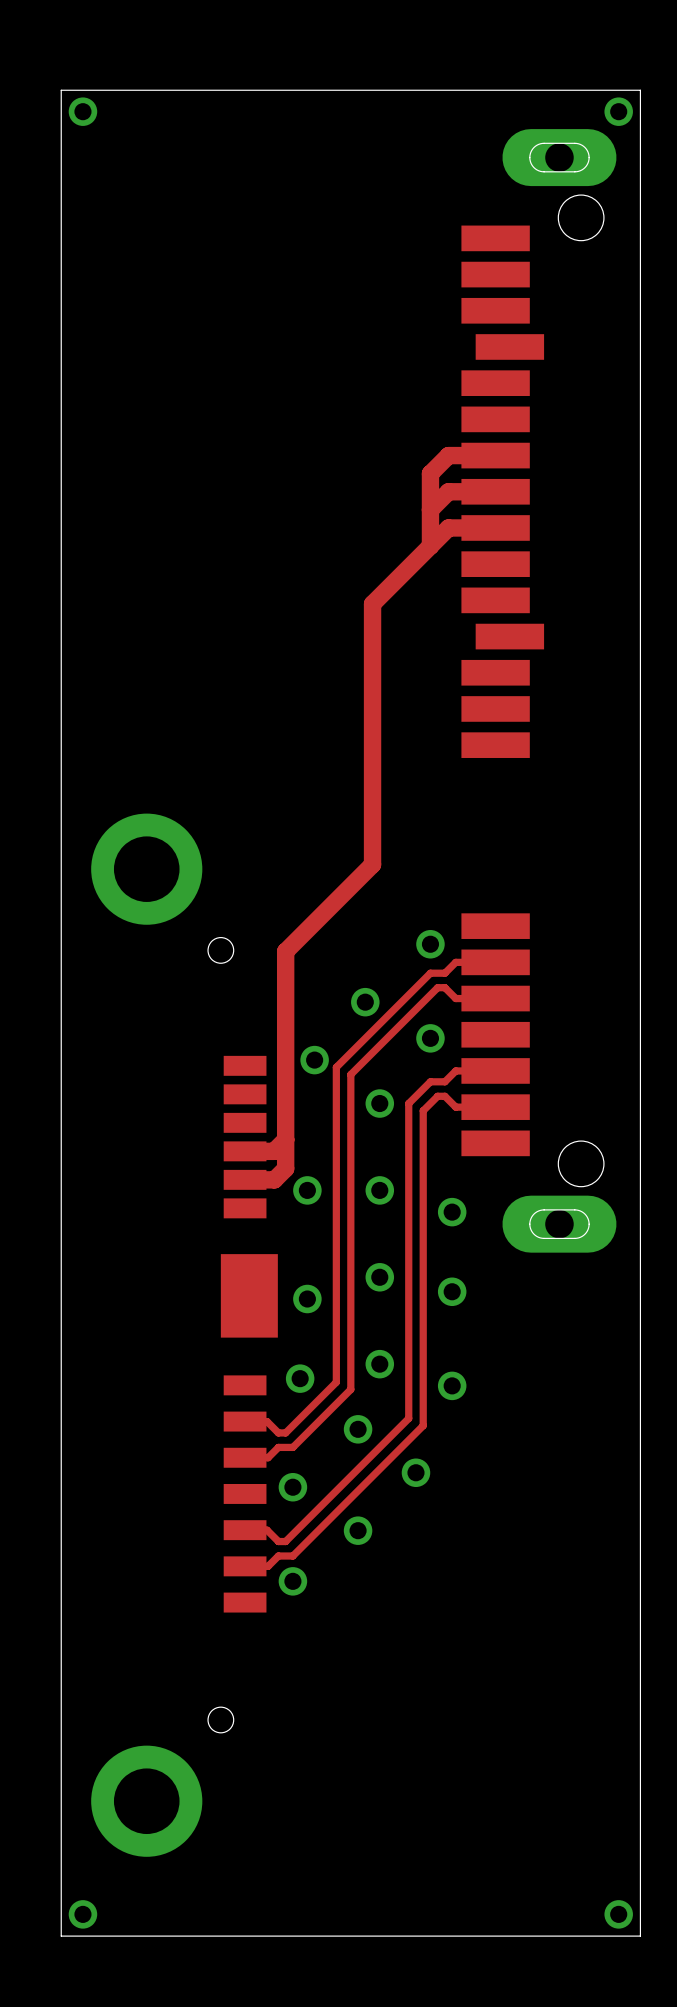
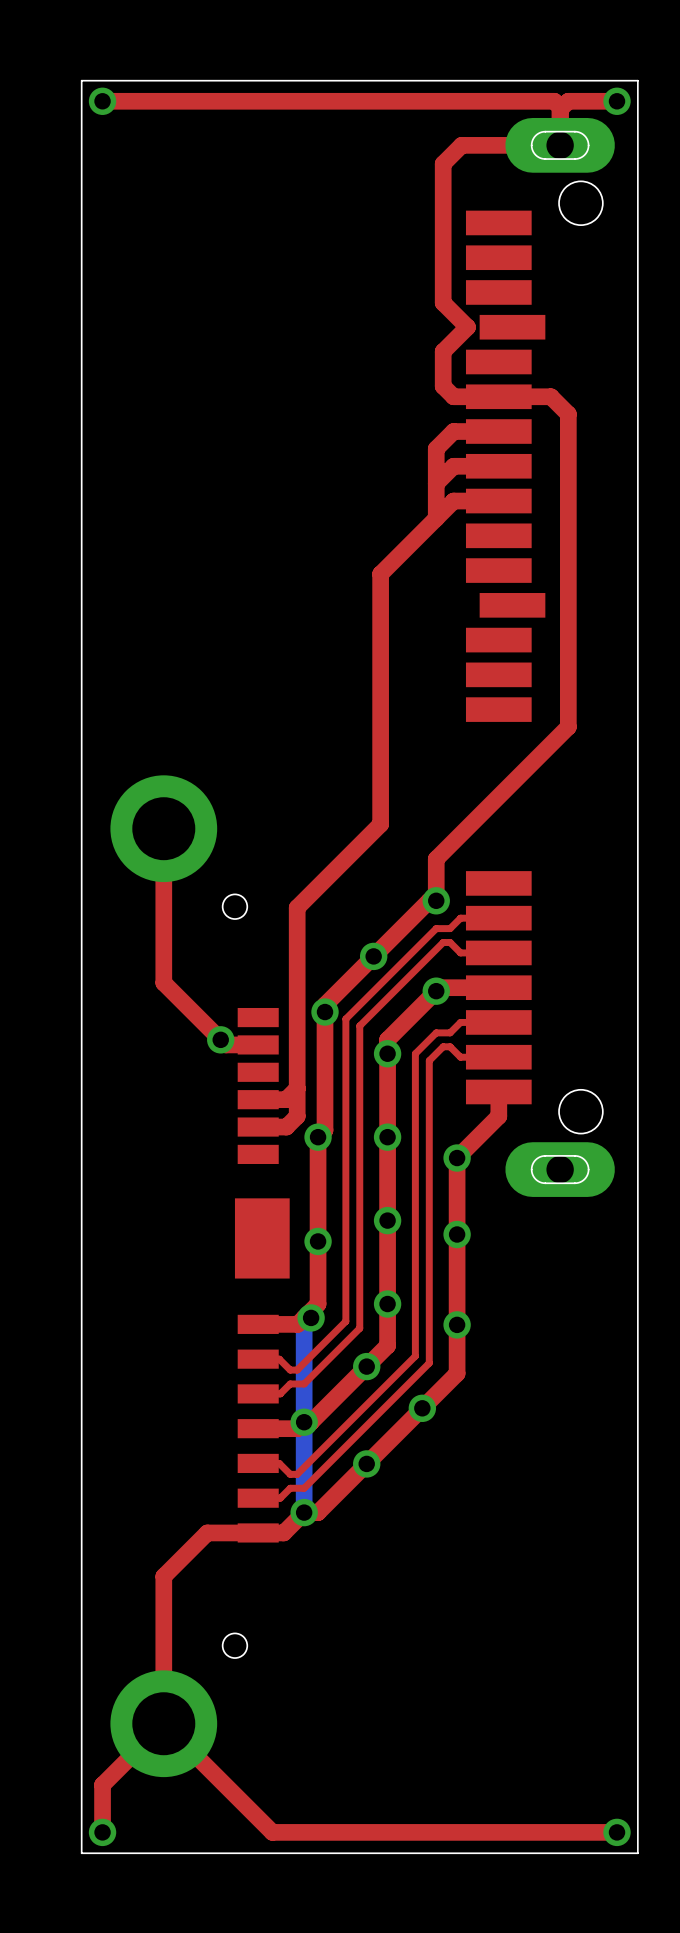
top track: none -> (102, 101) (554, 101) (560, 106) (560, 145) (461, 145) (443, 163) (443, 302) (467, 327) (443, 351) (443, 386) (453, 396) (550, 396) (568, 414) (568, 726) (436, 859) (436, 900) (429, 900) (325, 1005) (325, 1130) (318, 1137) (318, 1304) (297, 1324) (258, 1324)
top track: none -> (617, 101) (568, 101) (560, 109)
top track: none -> (163, 828) (163, 982) (225, 1044) (258, 1044)
top track: none -> (498, 987) (439, 987) (387, 1039) (387, 1345) (311, 1422) (304, 1422) (297, 1428) (258, 1428)
via: none -> (220, 1039)
top track: none -> (498, 1091) (498, 1116) (457, 1158) (457, 1373) (318, 1512) (304, 1512) (283, 1532) (207, 1532) (163, 1576) (163, 1723)
bottom track: none -> (304, 1317) (304, 1512)
top track: none -> (163, 1723) (102, 1784) (102, 1832)
top track: none -> (163, 1723) (272, 1832) (617, 1832)

